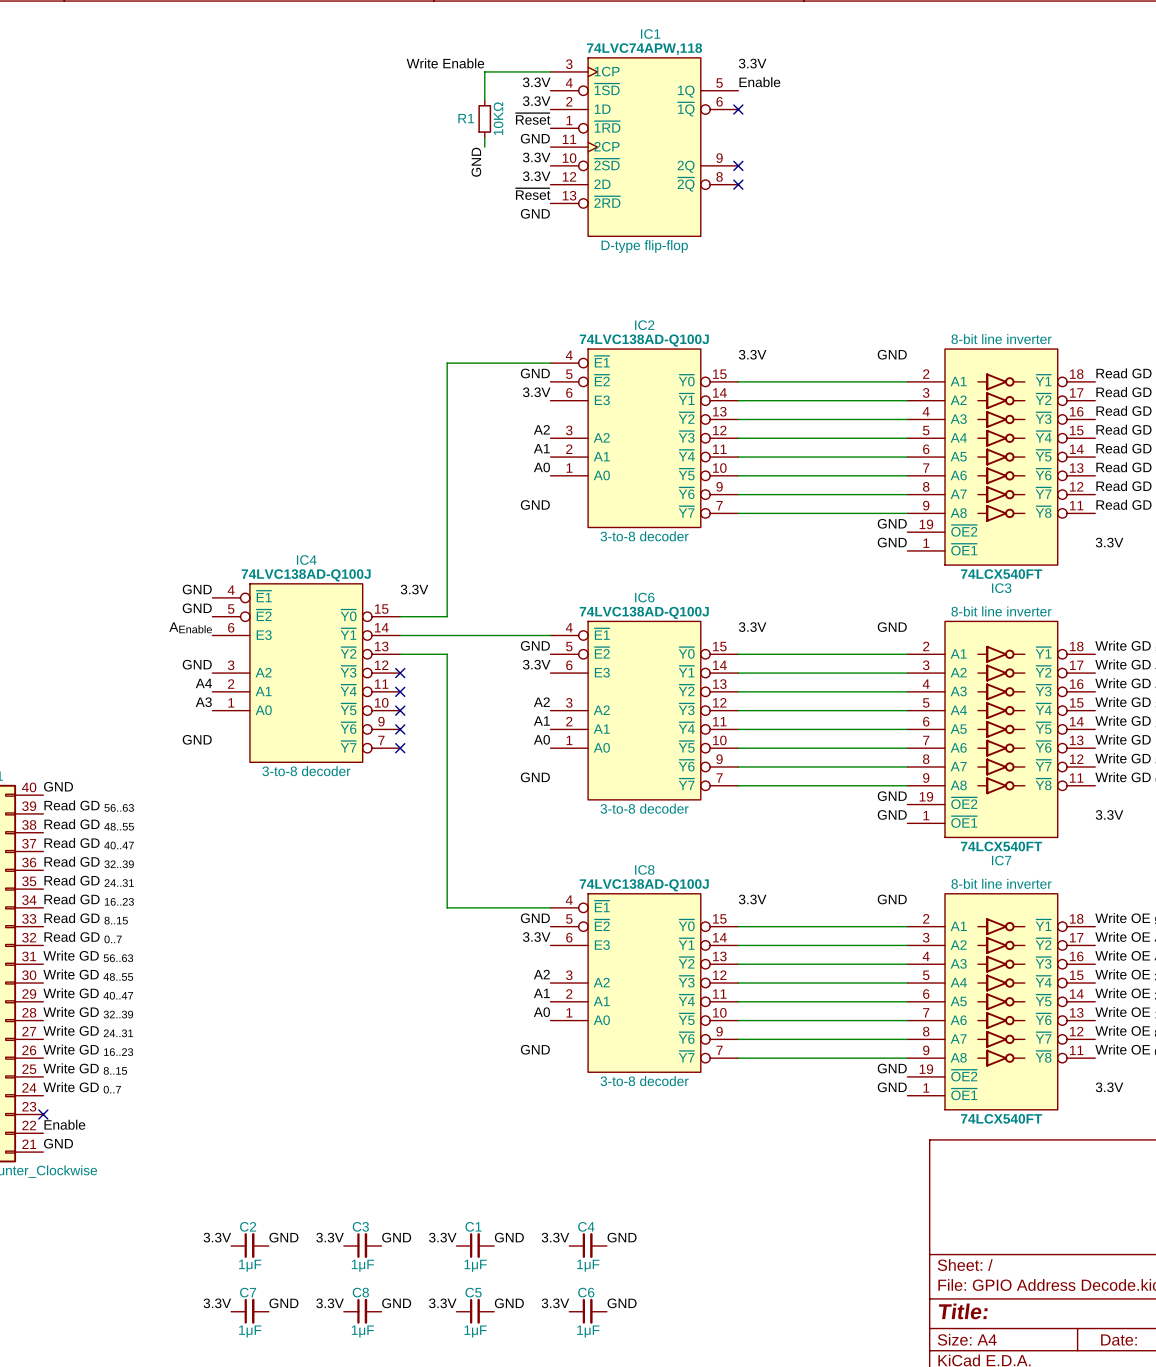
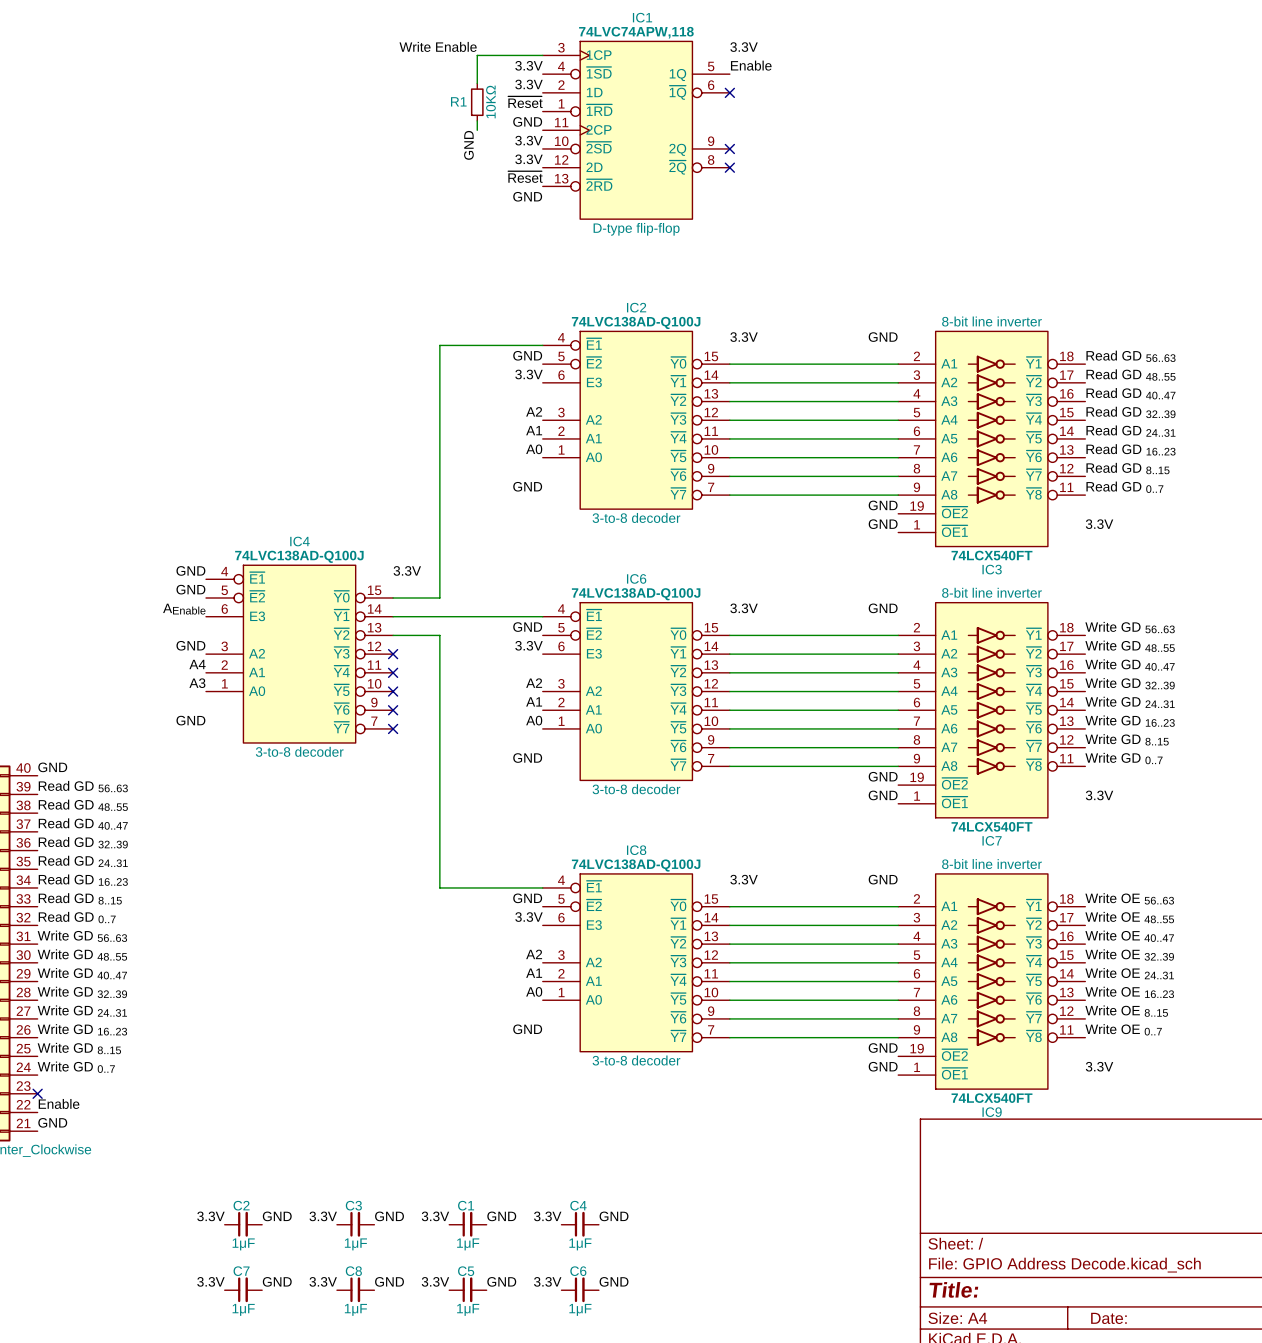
IC9 name: none -> IC9 (992, 1112)

